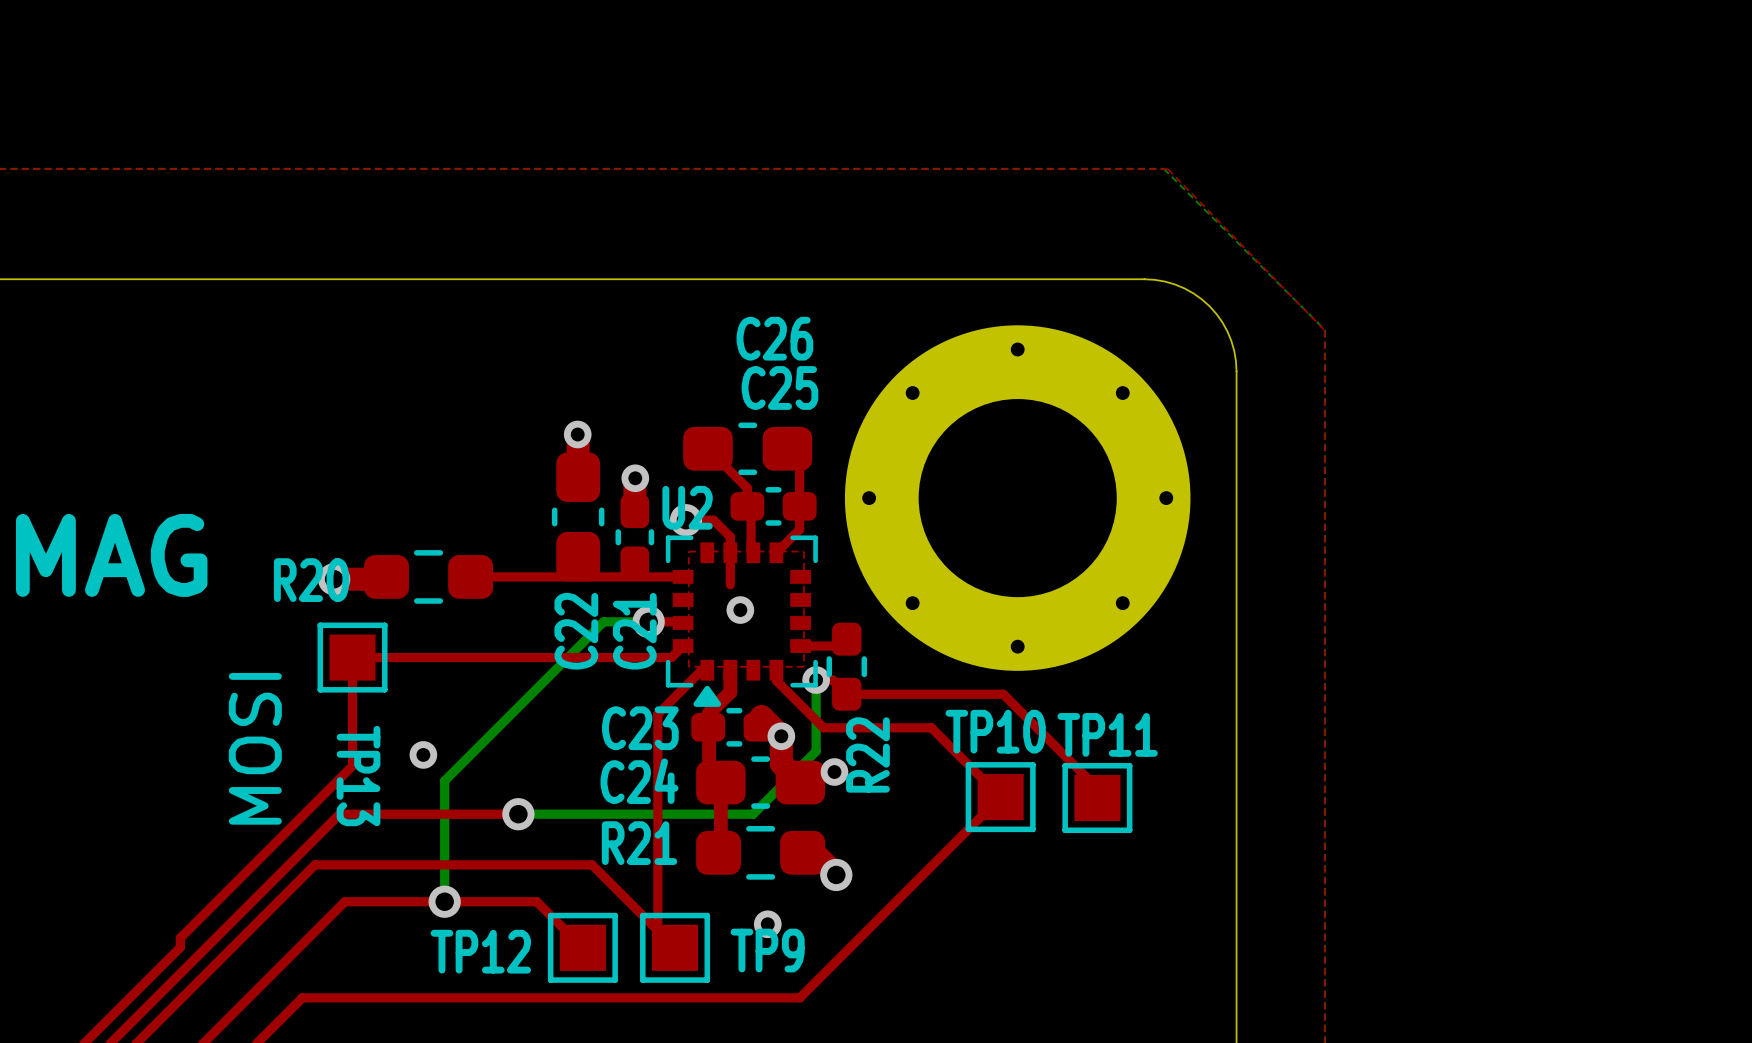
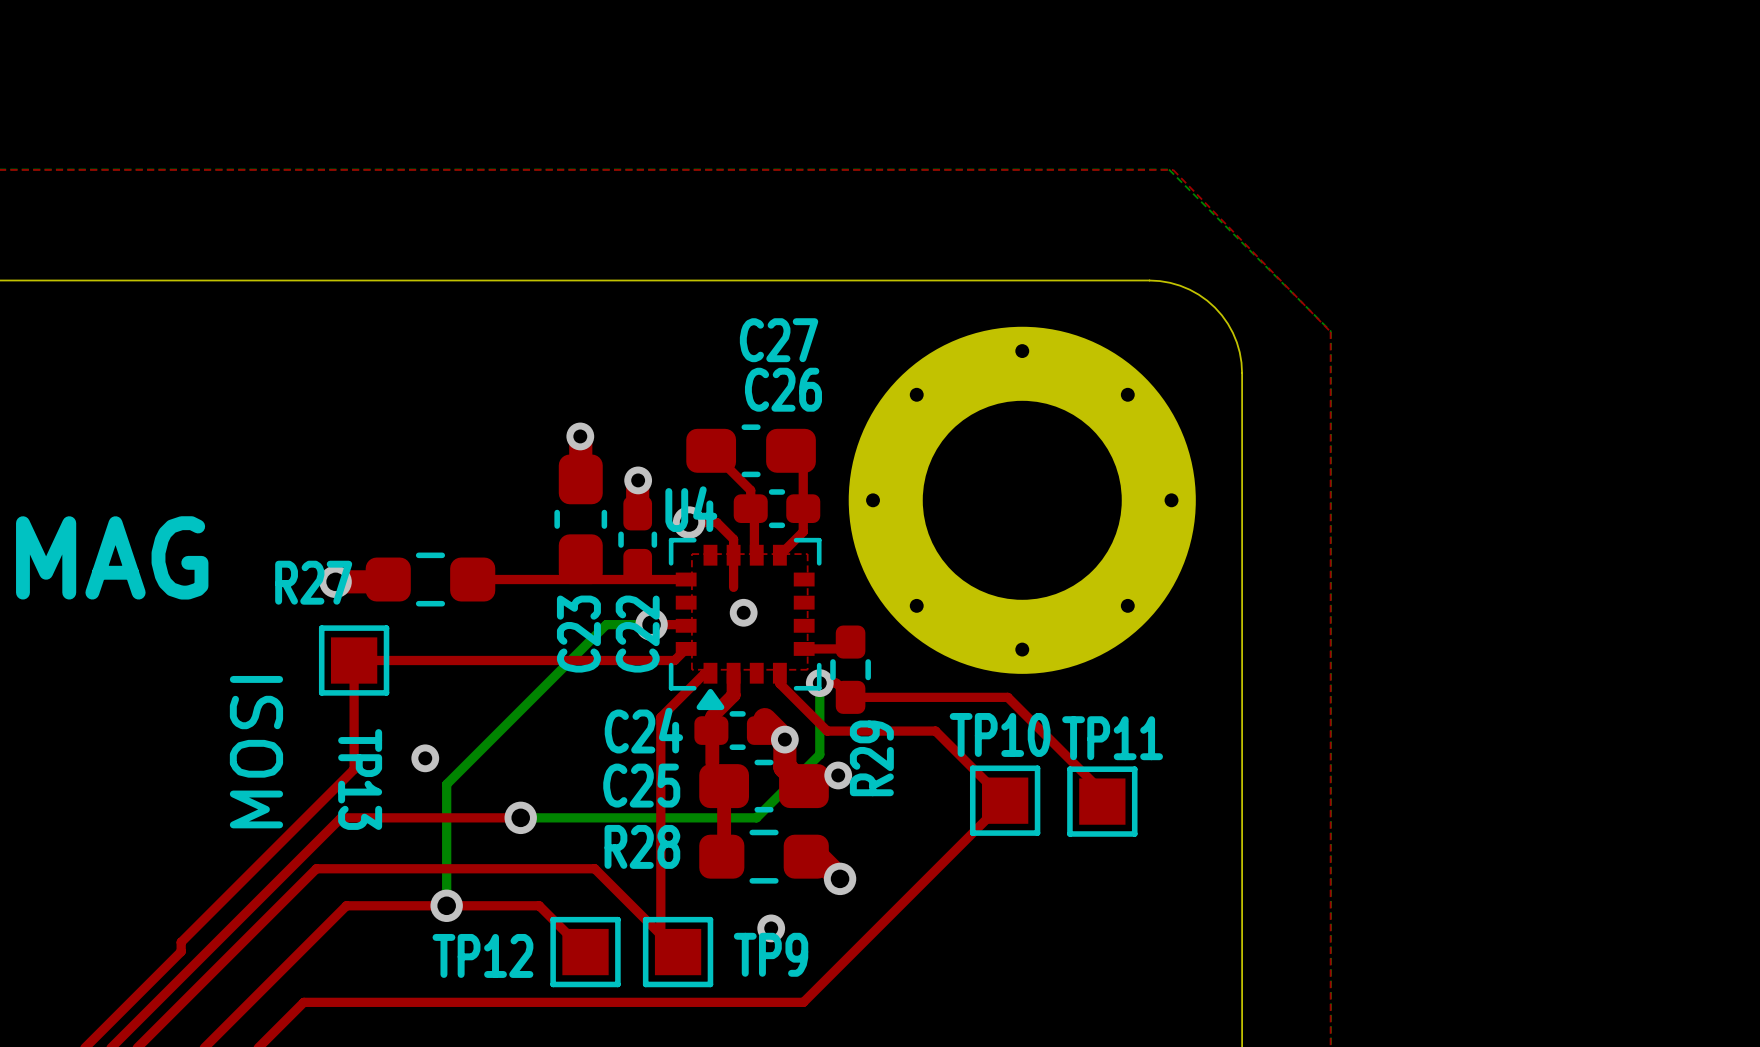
C26 name: C26 (774, 338) -> C27 (779, 340)
C25 name: C25 (779, 387) -> C26 (783, 389)
U2 name: U2 (687, 507) -> U4 (691, 509)
R20 name: R20 (311, 580) -> R27 (313, 582)
C22 name: C22 (576, 631) -> C23 (578, 634)
C21 name: C21 (634, 631) -> C22 (637, 634)
C23 name: C23 (640, 728) -> C24 (643, 730)
R22 name: R22 (867, 754) -> R29 (871, 758)
C24 name: C24 (639, 781) -> C25 (641, 785)
R21 name: R21 (639, 843) -> R28 (642, 846)

